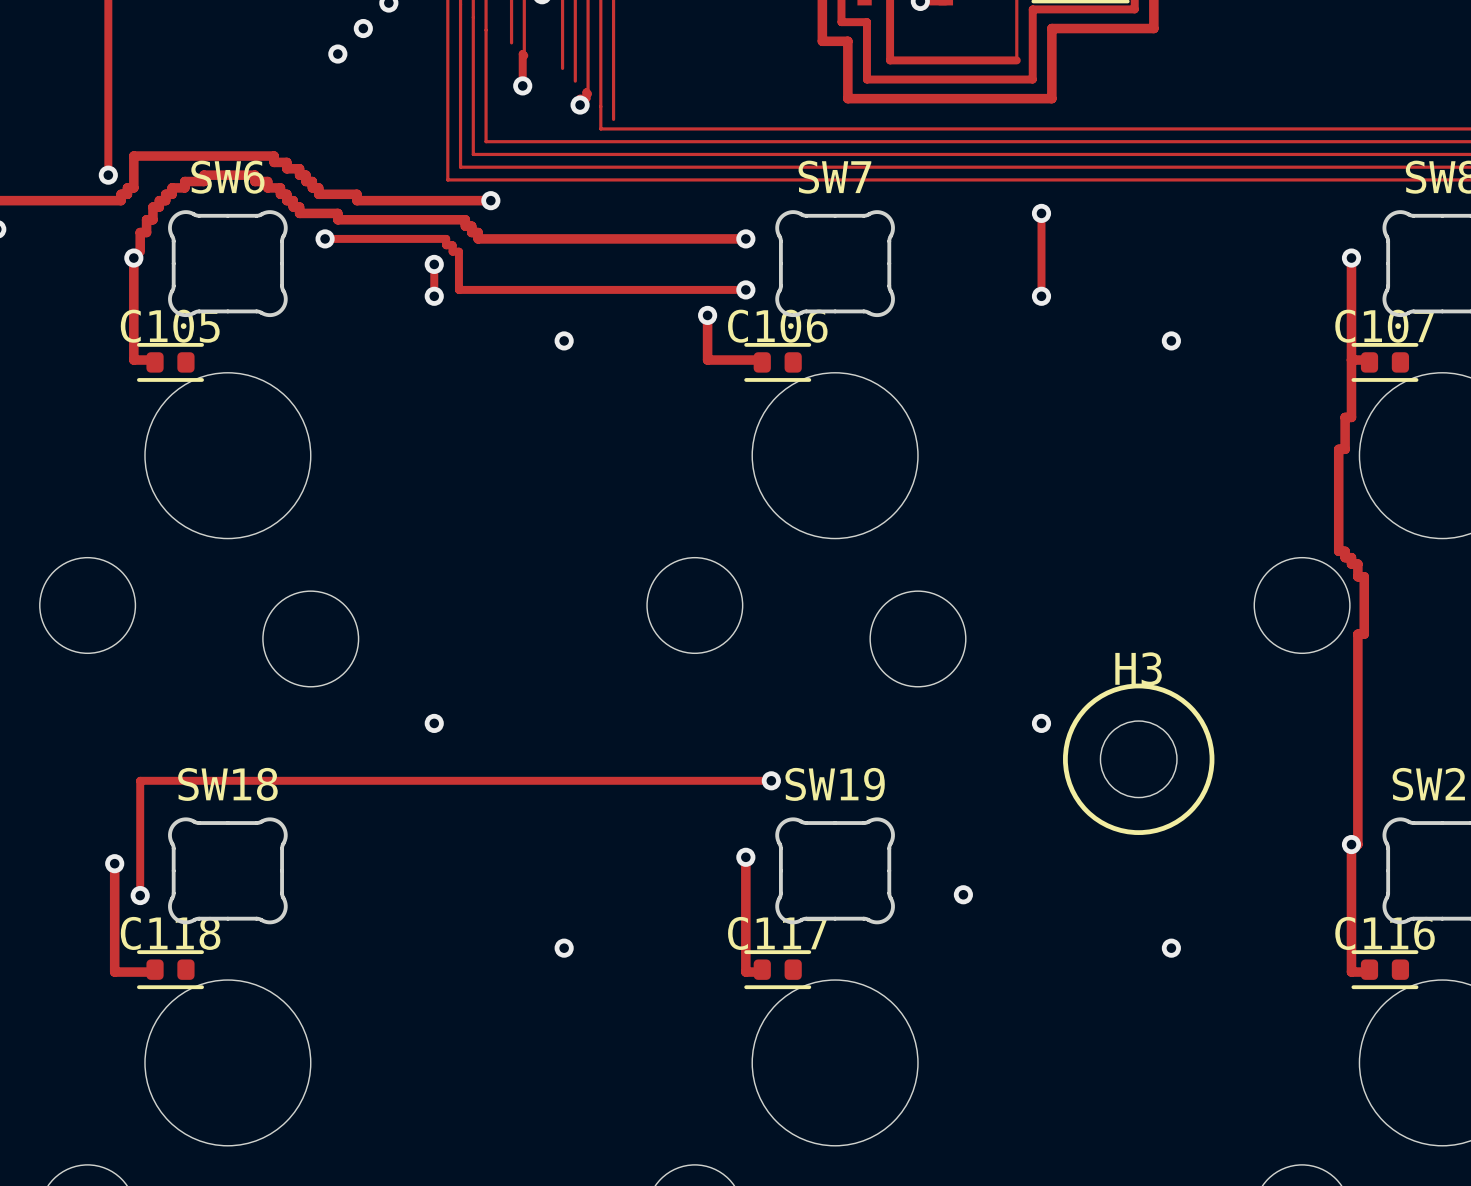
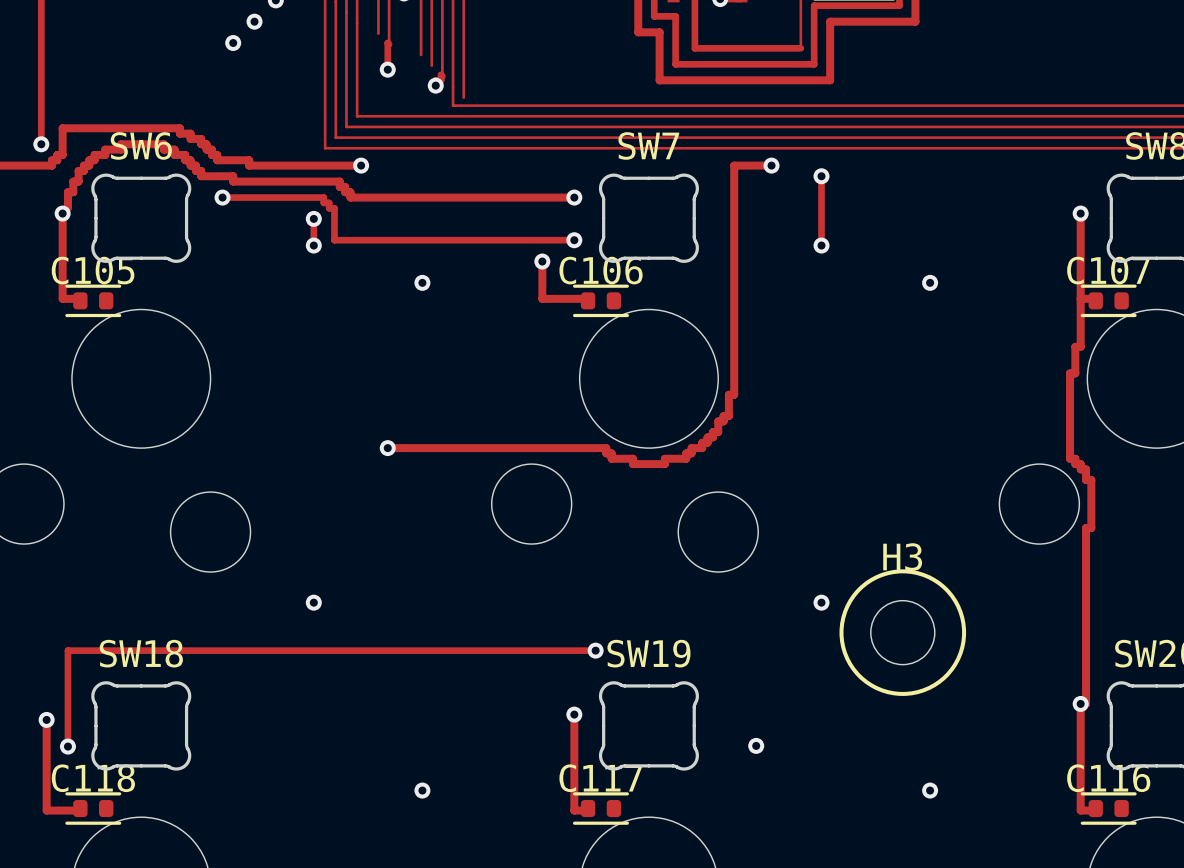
track: none -> (771, 165) (734, 165) (734, 394) (728, 394) (728, 416) (723, 416) (723, 421) (718, 421) (718, 432) (712, 432) (712, 437) (707, 437) (707, 442) (702, 442) (702, 448) (691, 448) (691, 453) (686, 453) (686, 458) (664, 458) (664, 464) (632, 464) (632, 458) (611, 458) (611, 453) (606, 453) (606, 448) (387, 448)
via: none -> (771, 165)
via: none -> (387, 448)

